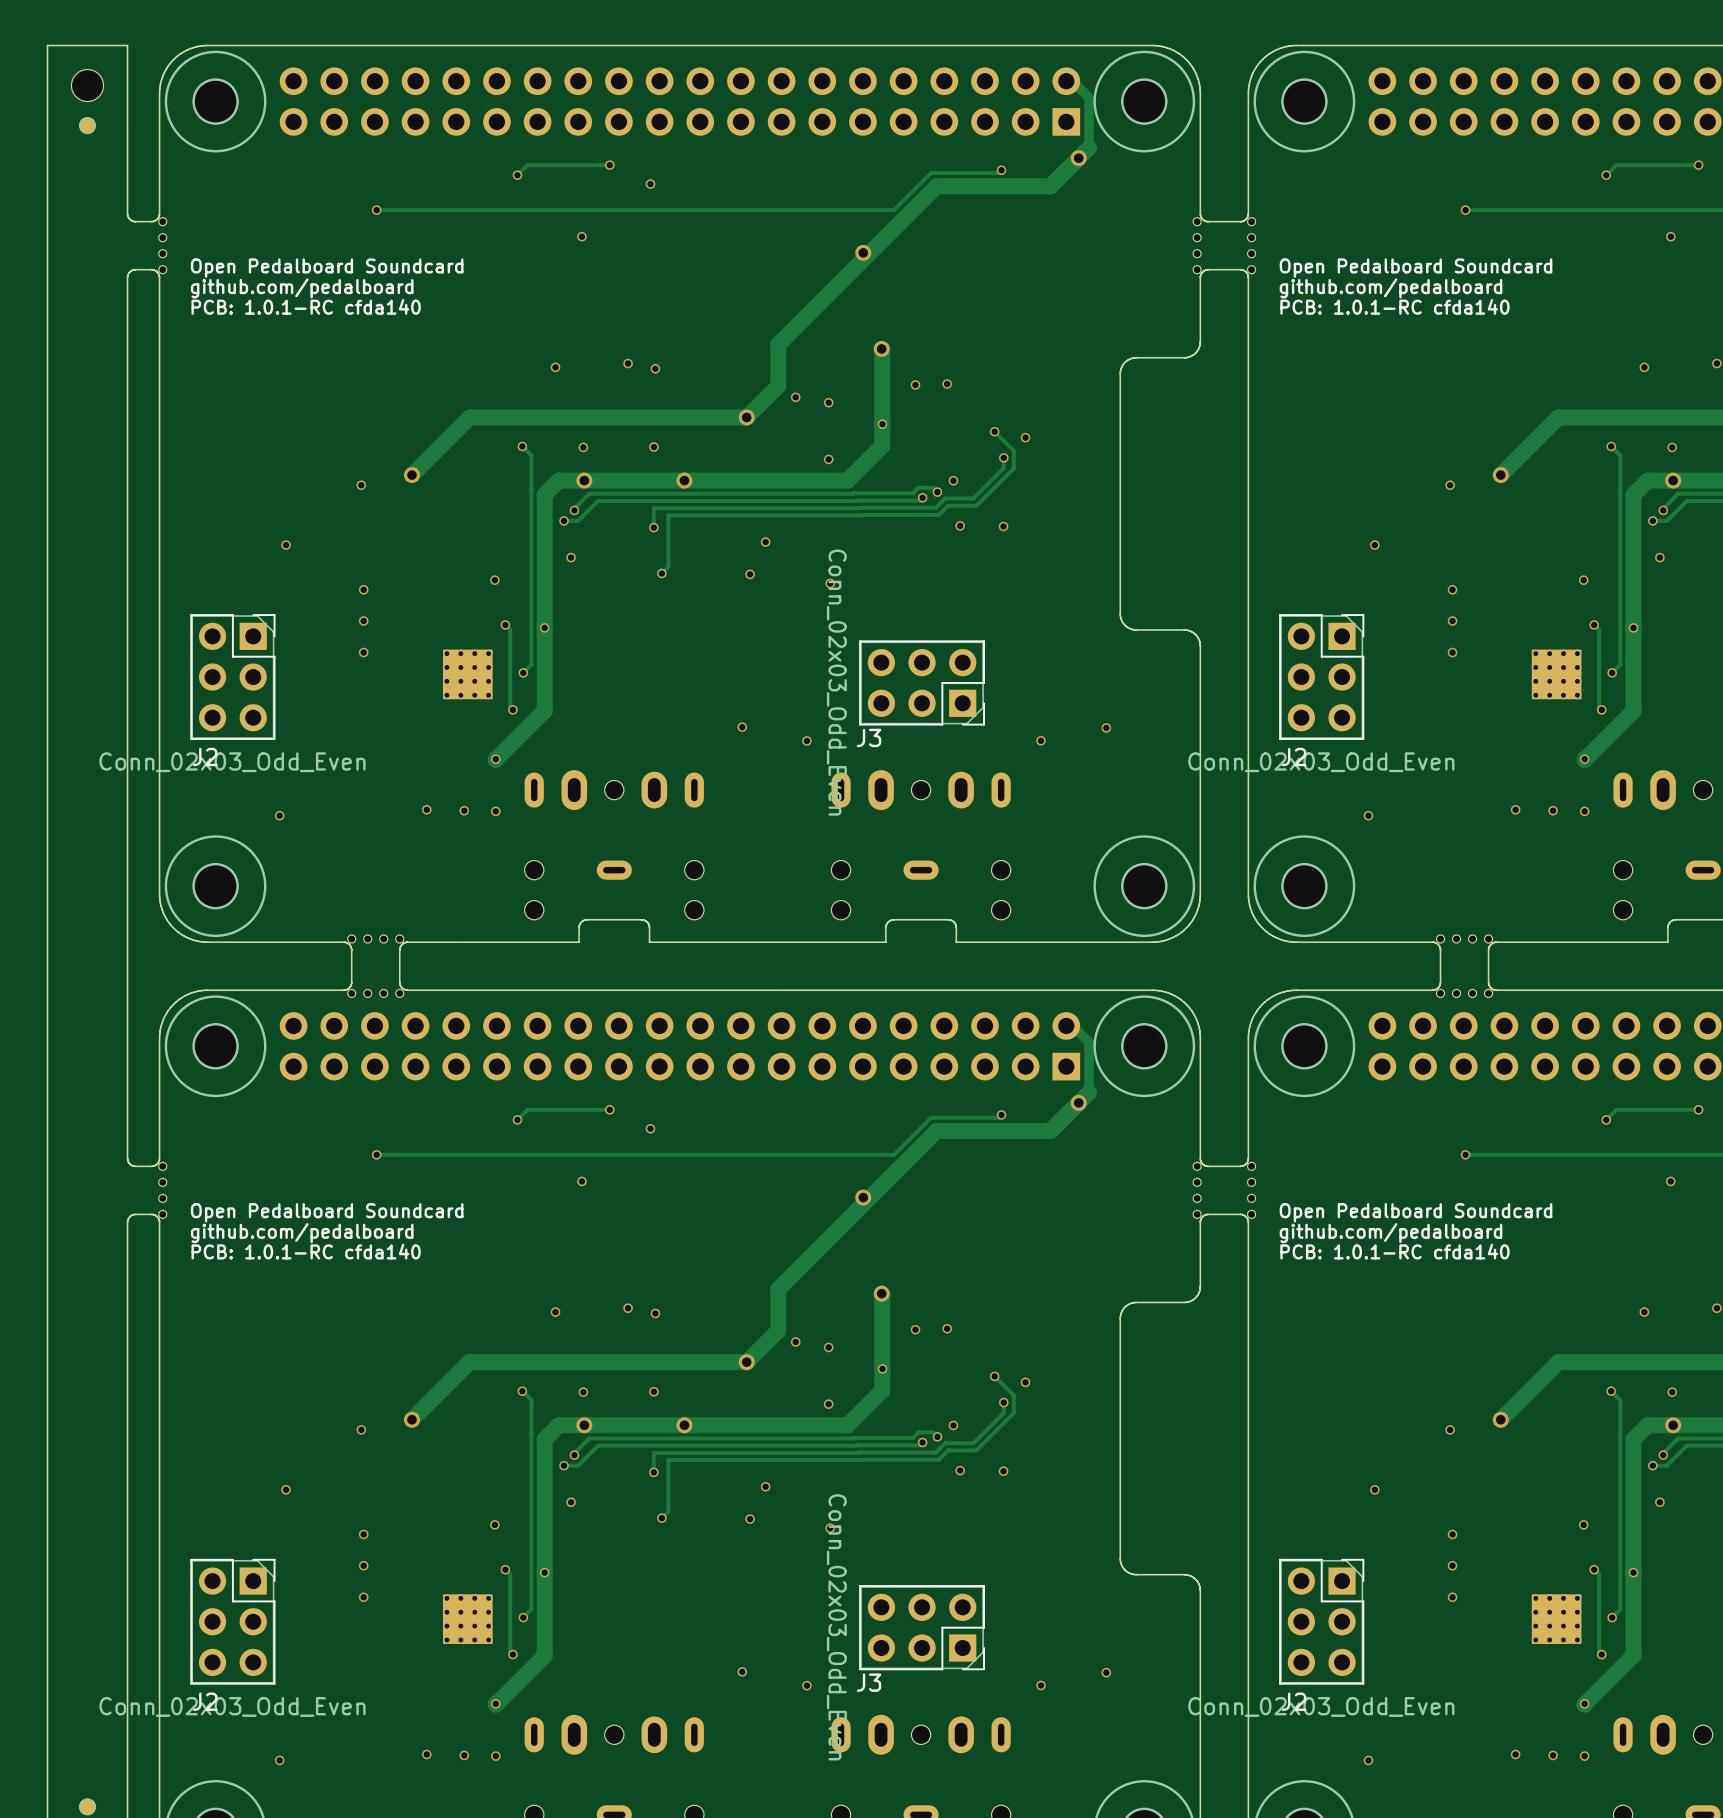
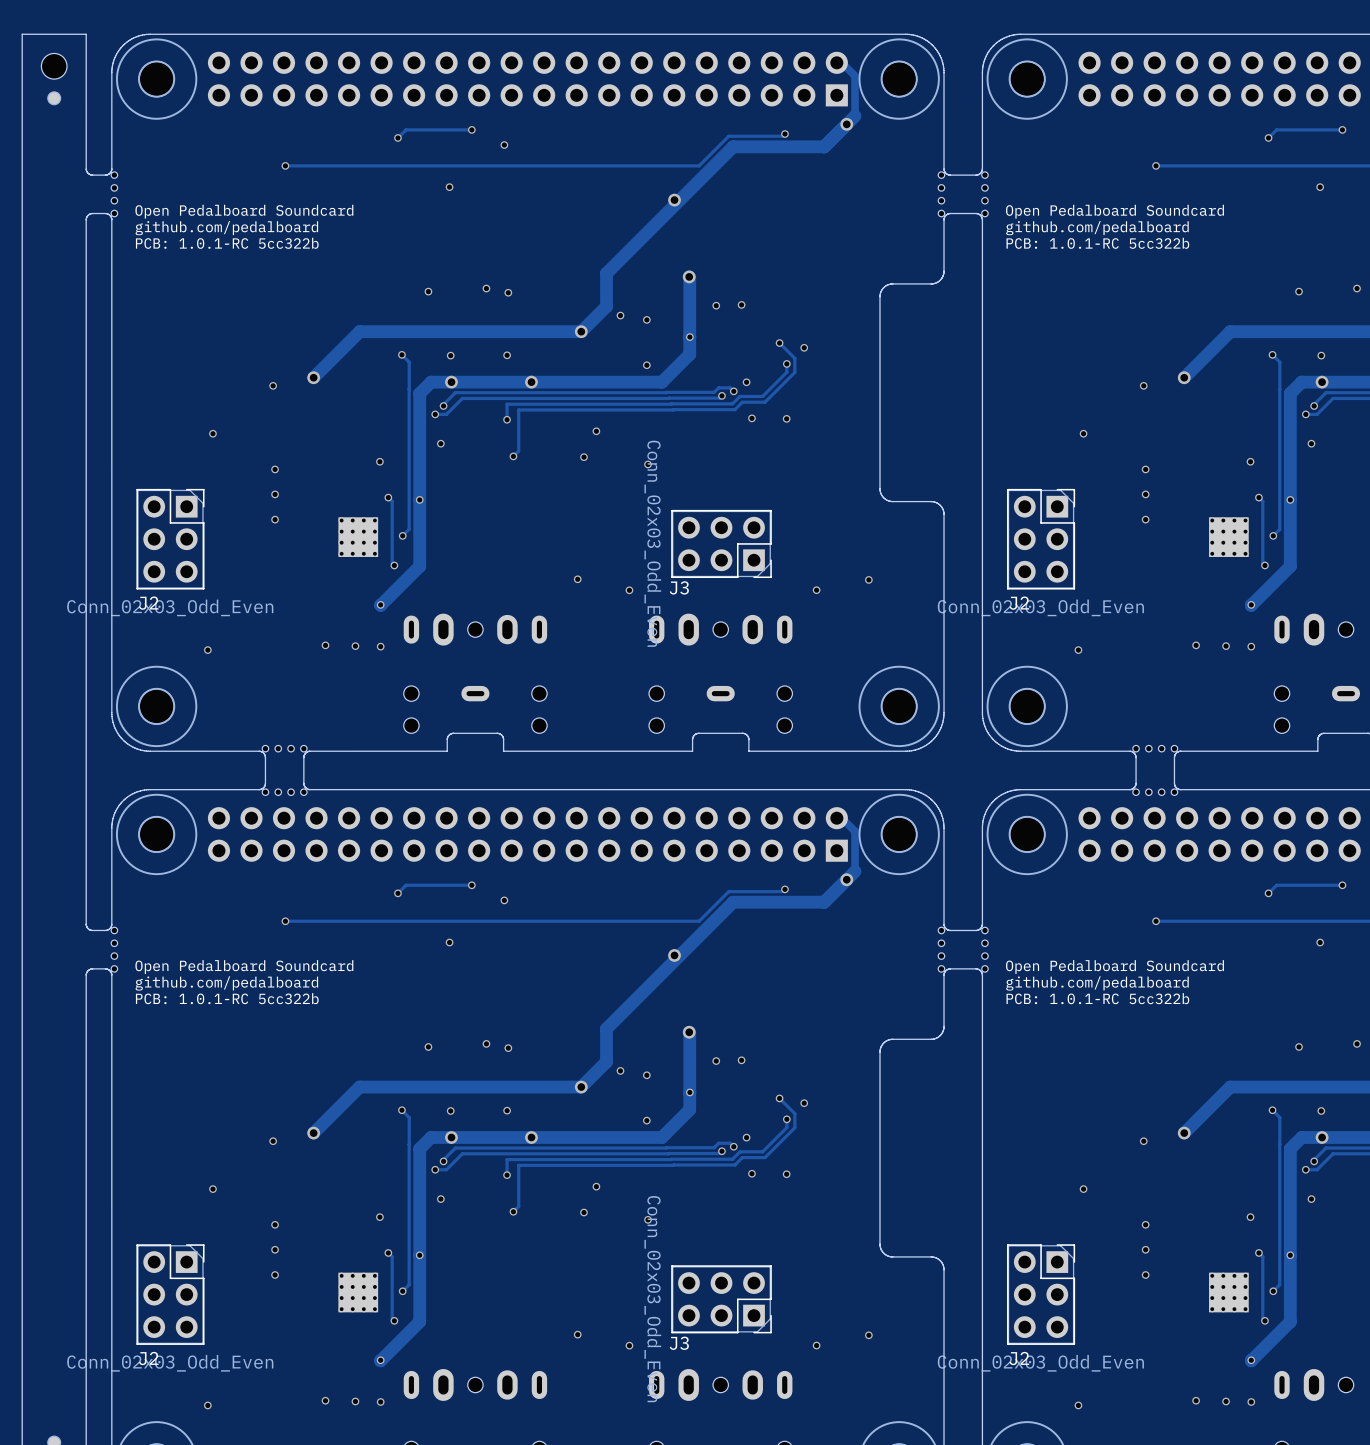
text: PCB: 1.0.1-RC cfda140 (306, 306) -> PCB: 1.0.1-RC 5cc322b (227, 243)
text: PCB: 1.0.1-RC cfda140 (1394, 306) -> PCB: 1.0.1-RC 5cc322b (1097, 243)
text: PCB: 1.0.1-RC cfda140 (306, 1251) -> PCB: 1.0.1-RC 5cc322b (227, 998)
text: PCB: 1.0.1-RC cfda140 (1394, 1251) -> PCB: 1.0.1-RC 5cc322b (1097, 998)

